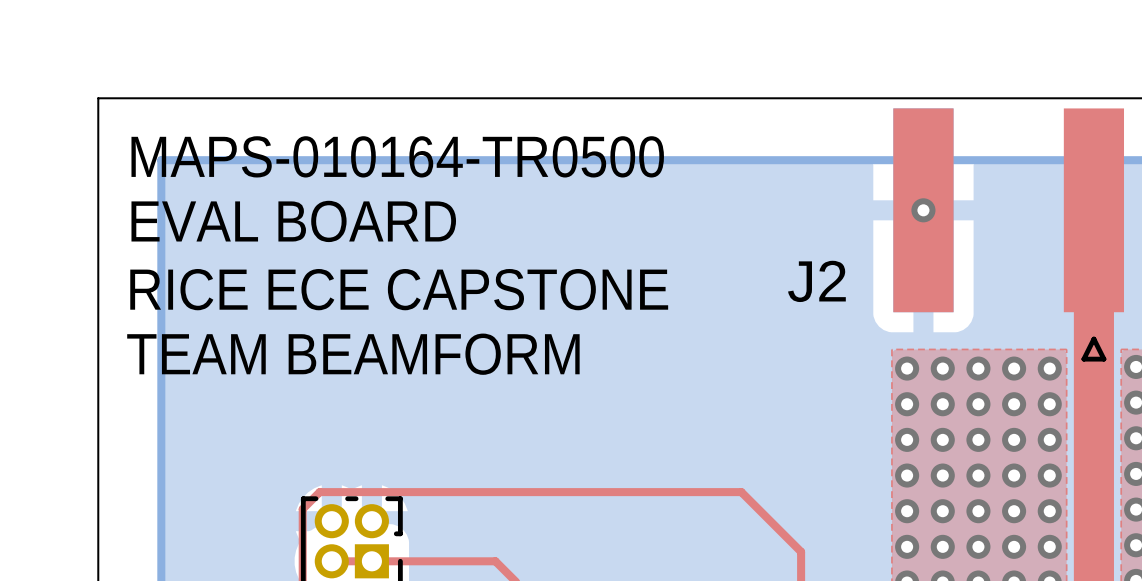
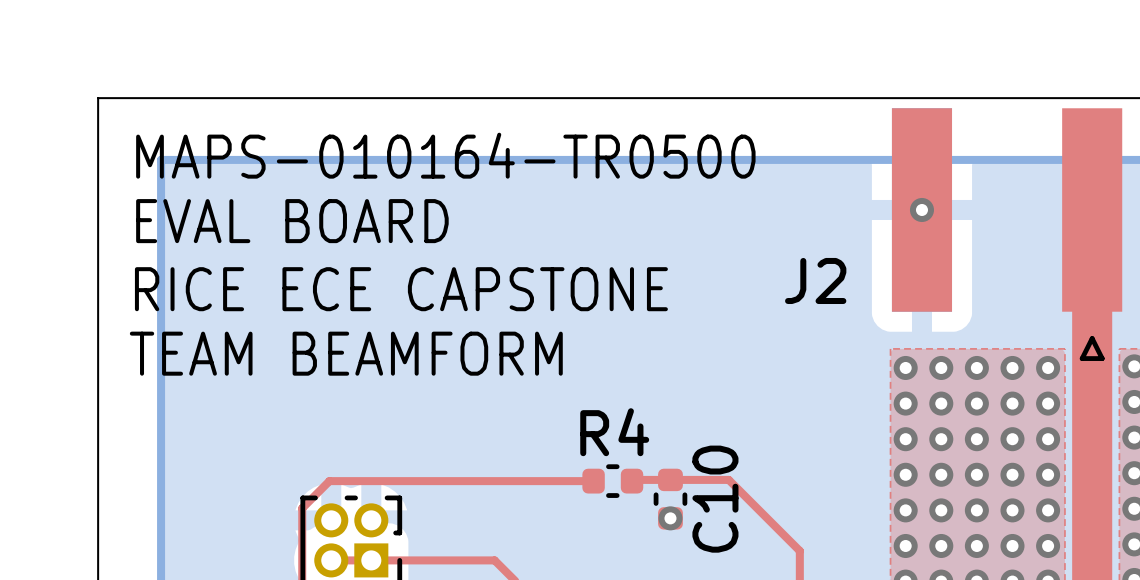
R4: none -> (612, 481)
top track: none -> (632, 481) (728, 479) (740, 491)
top track: (319, 492) (741, 492) -> (319, 491) (329, 481) (593, 481)
C10: none -> (670, 499)
via: none -> (670, 518)

